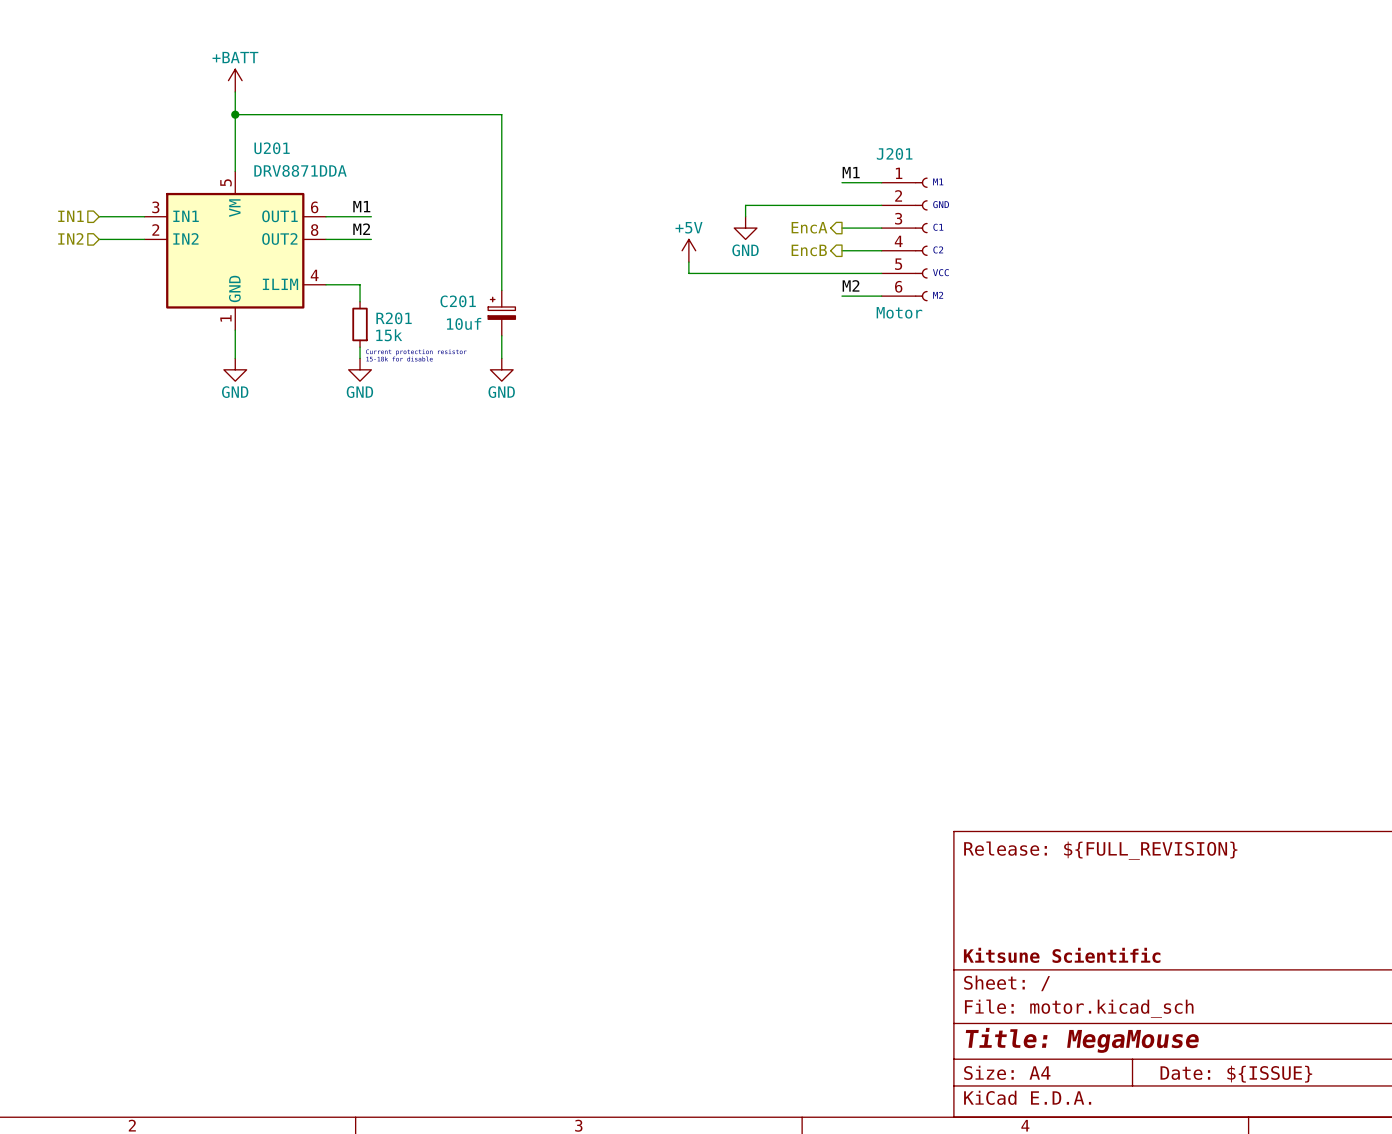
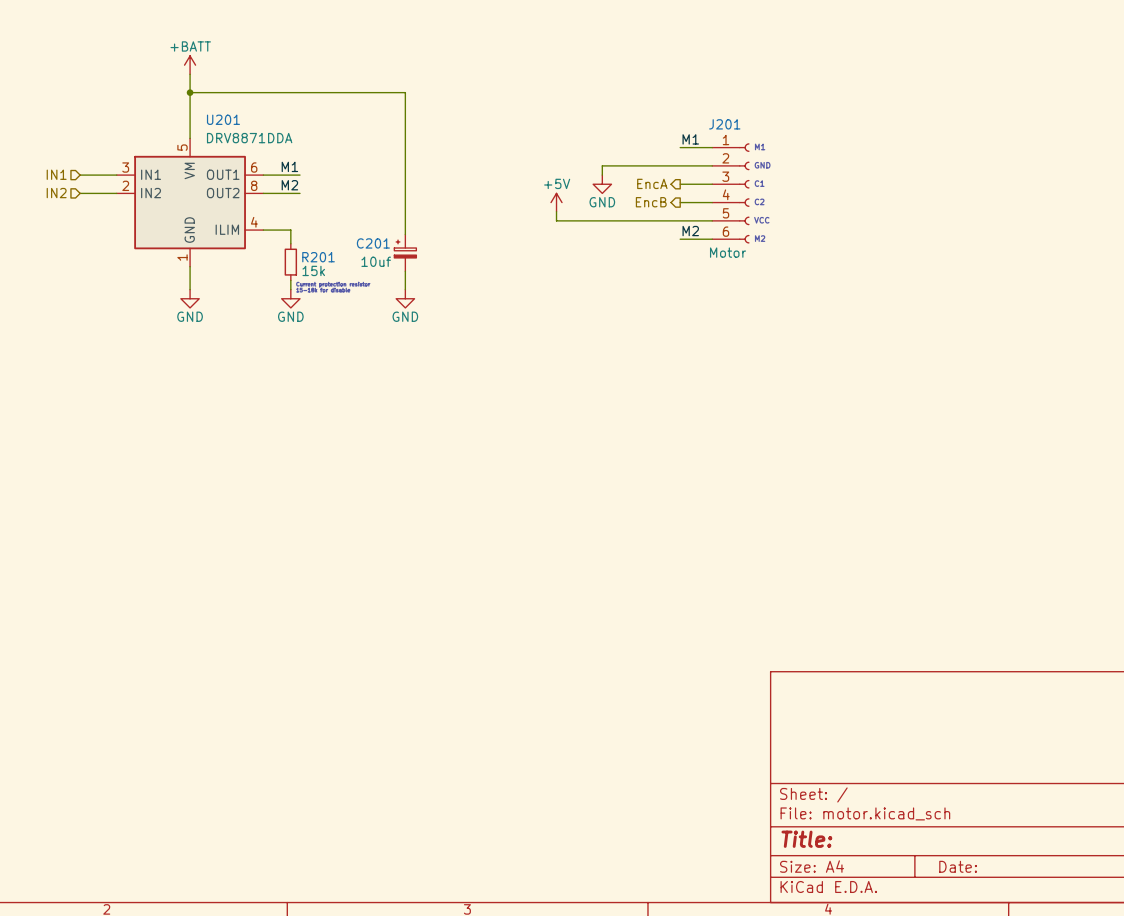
title block: Release: ${FULL_REVISION} (1100, 850) -> none
title block: Kitsune Scientific (1062, 955) -> none
title block: Title: MegaMouse (1082, 1040) -> Title: (806, 839)
title block: Date: ${ISSUE} (1236, 1074) -> Date: (958, 866)

